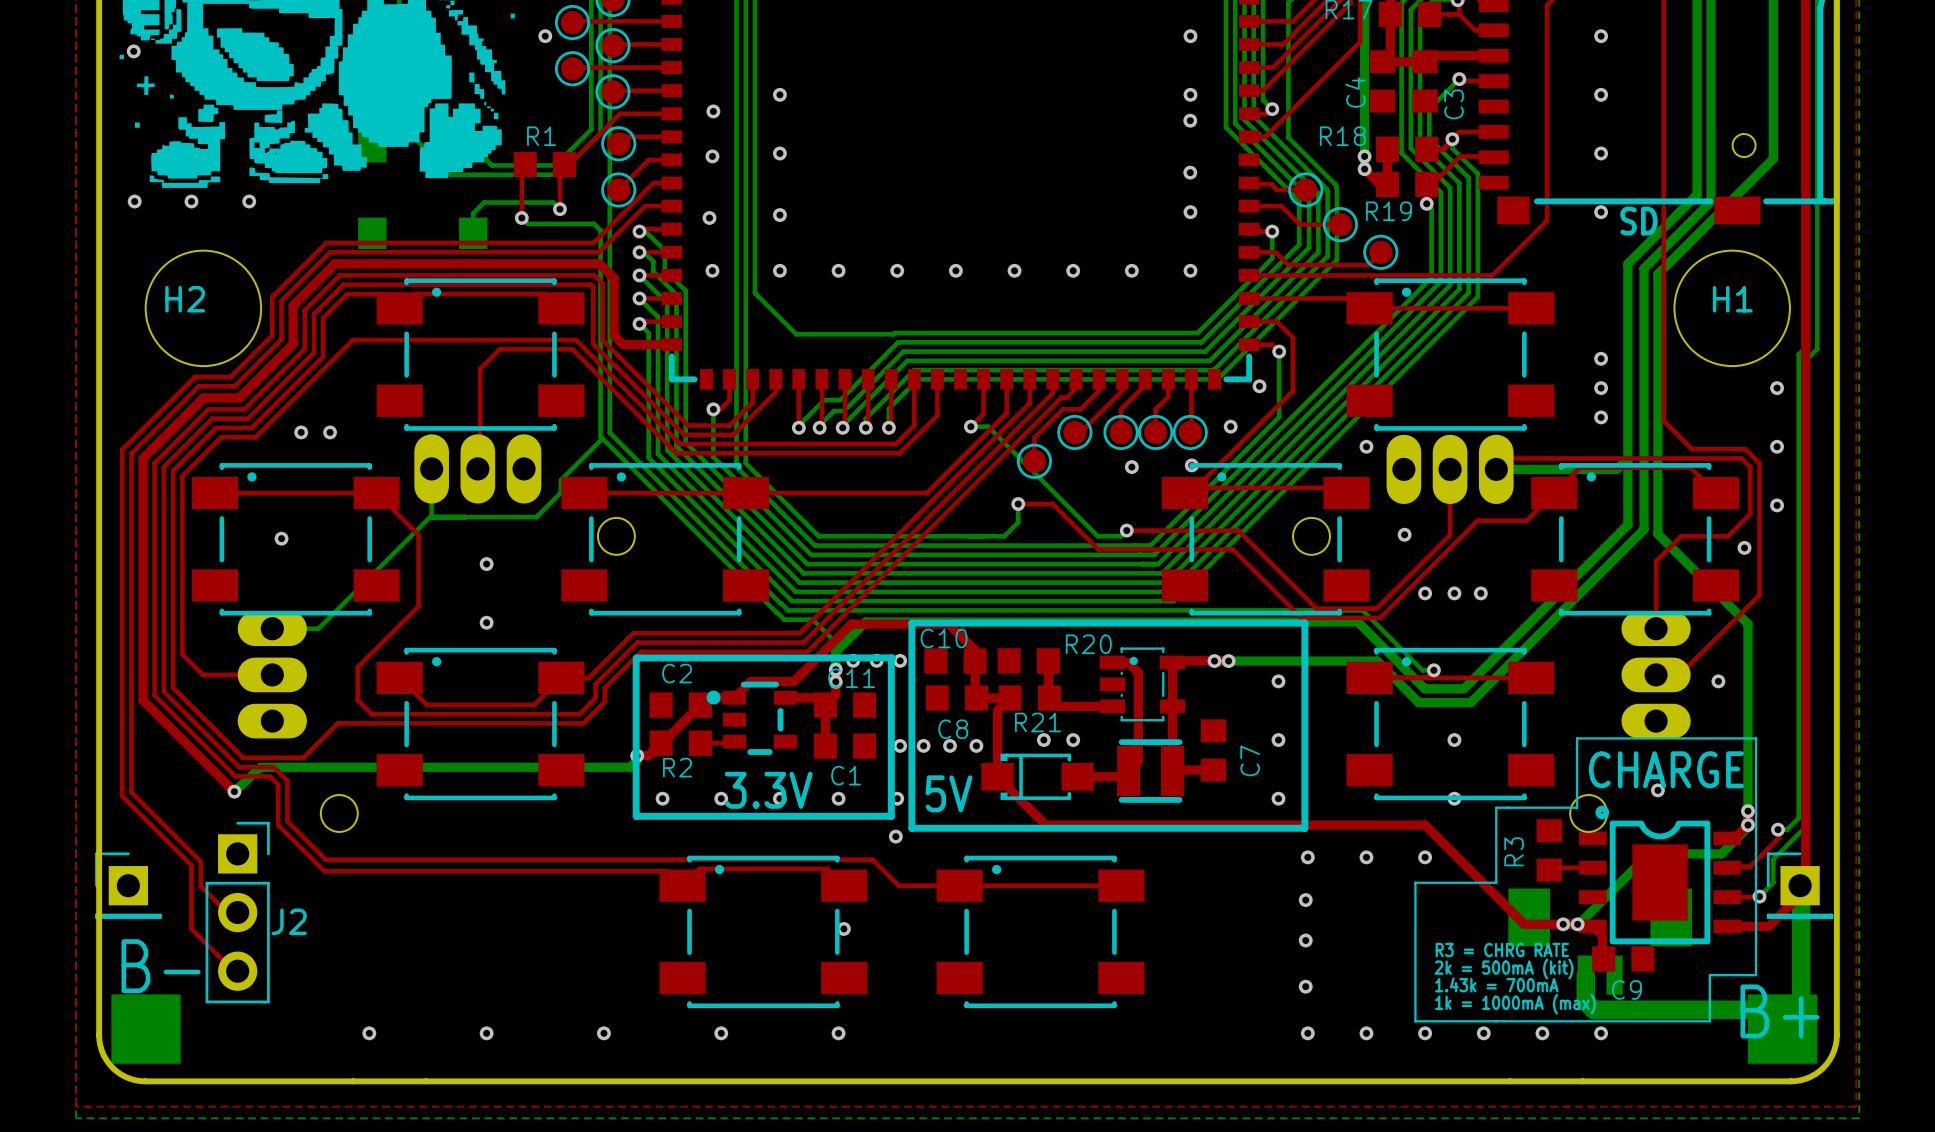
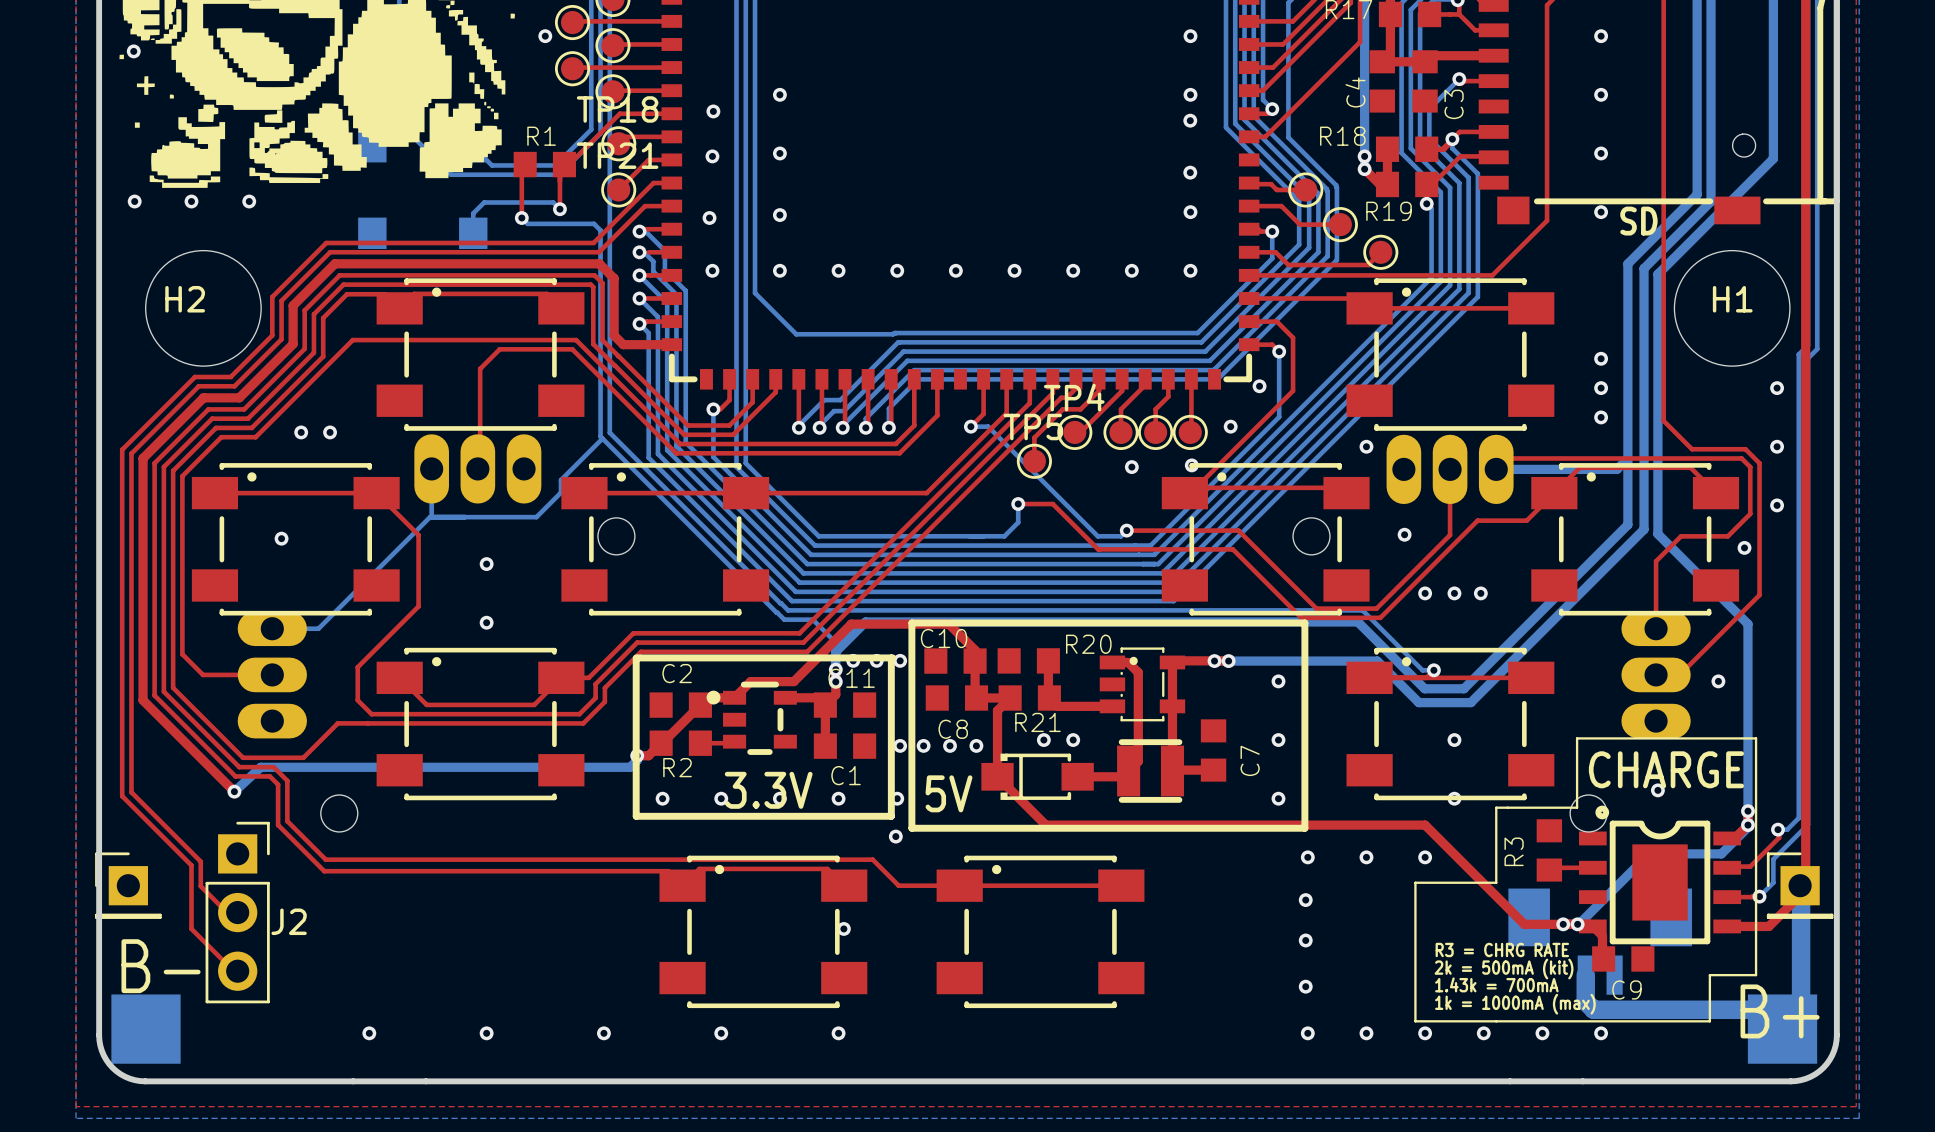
TP18 name: none -> TP18 (617, 109)
TP21 name: none -> TP21 (617, 155)
TP4 name: none -> TP4 (1074, 397)
TP5 name: none -> TP5 (1033, 427)

